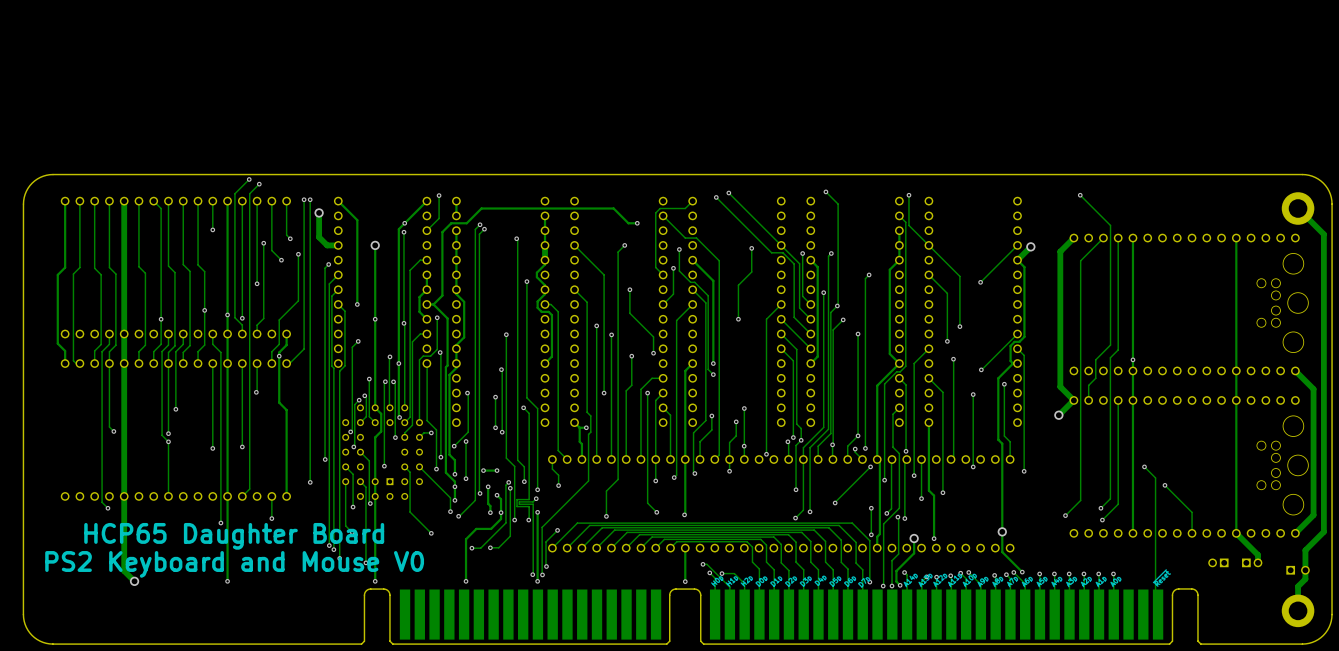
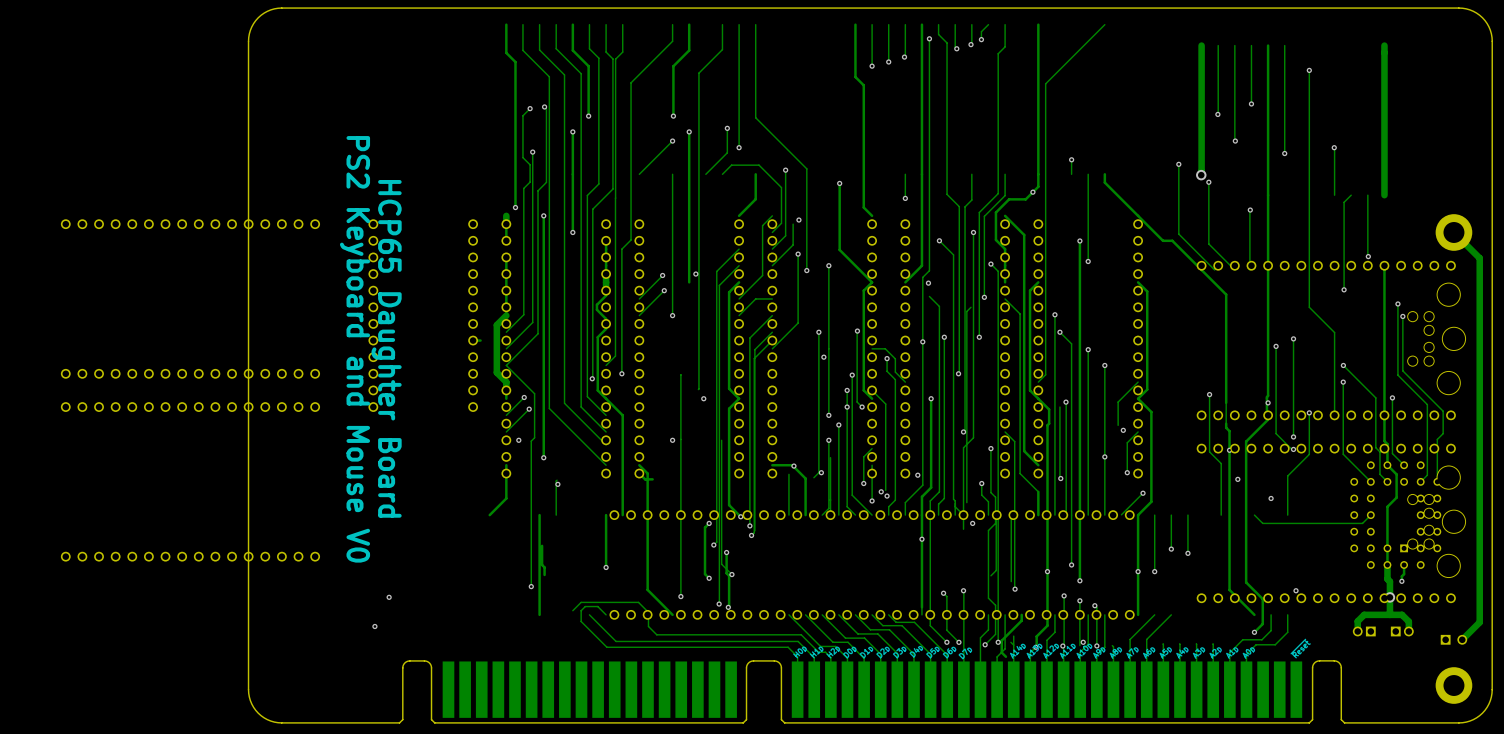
track: none -> (506, 24) (506, 52) (515, 62) (515, 207)
track: none -> (522, 24) (522, 50) (549, 76) (549, 408) (606, 465)
track: none -> (539, 24) (539, 50) (564, 74) (564, 403) (606, 444)
track: none -> (556, 24) (556, 48) (581, 73) (581, 407) (606, 431)
track: none -> (572, 24) (572, 50) (588, 66) (588, 116)
track: none -> (589, 24) (589, 48) (598, 58) (598, 184) (587, 195) (587, 396) (606, 415)
track: none -> (606, 24) (606, 52) (612, 58) (612, 189) (592, 209) (592, 378)
track: none -> (622, 24) (622, 52) (615, 59) (615, 198)
track: none -> (672, 24) (672, 41) (631, 82) (631, 240) (621, 249) (621, 373)
track: none -> (689, 24) (689, 50) (673, 66) (673, 116)
track: none -> (722, 24) (722, 49) (698, 73) (698, 389)
track: none -> (739, 24) (739, 147)
track: none -> (755, 24) (755, 117) (806, 168) (806, 270)
track: none -> (855, 24) (855, 77) (863, 85) (863, 207) (872, 215)
track: none -> (872, 24) (872, 66)
track: none -> (888, 24) (888, 62)
track: none -> (905, 24) (904, 57)
track: none -> (921, 24) (921, 265) (905, 282)
track: none -> (938, 24) (938, 34) (947, 42) (947, 194) (959, 206) (959, 373)
track: none -> (955, 24) (956, 48)
track: none -> (971, 24) (971, 44)
track: none -> (988, 24) (981, 31) (981, 39)
track: none -> (1005, 24) (1005, 46) (998, 53) (998, 193) (979, 212) (979, 337)
track: none -> (1038, 24) (1038, 186) (1025, 199) (1009, 199) (995, 212) (995, 239) (1005, 249) (1005, 257)
track: none -> (1104, 24) (1045, 83) (1045, 374) (1038, 382)
track: none -> (929, 38) (929, 270) (922, 277) (922, 485) (905, 502) (905, 515)
via: none -> (929, 38)
via: none -> (981, 39)
via: none -> (971, 44)
track: none -> (1201, 45) (1201, 175)
track: none -> (1218, 45) (1217, 114)
track: none -> (1234, 45) (1235, 141)
track: none -> (1251, 45) (1251, 103)
track: none -> (1268, 45) (1268, 265)
track: none -> (1284, 45) (1284, 153)
track: none -> (1384, 45) (1384, 195)
via: none -> (956, 48)
via: none -> (904, 57)
via: none -> (888, 62)
via: none -> (872, 66)
track: none -> (1309, 70) (1309, 307) (1334, 332) (1334, 419)
via: none -> (1309, 70)
via: none -> (1251, 103)
track: none -> (544, 106) (546, 108) (546, 182) (538, 190) (538, 333) (506, 365) (534, 393) (534, 437) (531, 441) (531, 586)
via: none -> (544, 106)
track: none -> (530, 108) (522, 115) (522, 157) (530, 164) (530, 182) (523, 188) (523, 314) (506, 332)
via: none -> (530, 108)
via: none -> (1217, 114)
via: none -> (588, 116)
via: none -> (673, 116)
track: none -> (727, 128) (727, 152) (705, 174)
via: none -> (727, 128)
track: none -> (572, 131) (572, 232)
via: none -> (572, 131)
track: none -> (689, 131) (689, 282)
via: none -> (689, 131)
track: none -> (672, 141) (639, 174)
via: none -> (672, 141)
via: none -> (1235, 141)
via: none -> (739, 147)
track: none -> (1334, 147) (1334, 195)
via: none -> (1334, 147)
track: none -> (532, 152) (532, 322) (506, 348)
via: none -> (532, 152)
via: none -> (1284, 153)
track: none -> (1071, 159) (1071, 174)
via: none -> (1071, 159)
track: none -> (1178, 164) (1178, 234) (1214, 270)
via: none -> (1178, 164)
track: none -> (785, 170) (785, 235) (772, 249)
via: none -> (785, 170)
track: none -> (722, 174) (731, 165) (759, 165) (781, 187) (781, 223) (772, 232)
track: none -> (755, 174) (755, 199) (739, 215)
track: none -> (905, 174) (905, 198)
track: none -> (971, 174) (971, 200) (965, 206) (963, 431)
track: none -> (1005, 174) (1005, 195) (984, 216) (984, 297)
track: none -> (1088, 174) (1088, 261)
via: none -> (1201, 175)
track: none -> (1208, 182) (1208, 244) (1234, 270)
via: none -> (1208, 182)
track: none -> (839, 183) (839, 249) (872, 282) (863, 290) (863, 390) (872, 398)
via: none -> (839, 183)
via: none -> (1032, 192)
track: none -> (1351, 195) (1344, 202) (1344, 289)
track: none -> (1367, 195) (1368, 256)
track: none -> (615, 198) (615, 356) (606, 365)
via: none -> (905, 198)
track: (249, 179) (234, 193) (234, 317) (242, 325) (242, 334) -> none
via: (249, 179) -> none
track: (259, 184) (249, 193) (249, 489) (242, 496) -> none
via: (259, 184) -> none
via: none -> (515, 207)
track: none -> (1250, 210) (1249, 270)
via: none -> (1250, 210)
track: (825, 191) (838, 204) (838, 305) (830, 312) (830, 433) (818, 446) (818, 459) -> none
via: (825, 191) -> none
track: none -> (506, 215) (506, 224)
track: none -> (543, 215) (543, 457)
via: none -> (543, 215)
track: none -> (772, 215) (762, 225) (762, 275) (739, 298)
track: (728, 193) (799, 263) (799, 308) (810, 319) -> none
via: (728, 193) -> none
track: none -> (1005, 215) (1024, 234) (1024, 451) (1038, 465)
track: (439, 195) (439, 218) (426, 230) -> none
via: (439, 195) -> none
track: (908, 195) (908, 225) (959, 276) (959, 326) -> none
via: (908, 195) -> none
track: (1080, 195) (1110, 225) (1110, 345) (1095, 359) -> (1104, 174) (1104, 182) (1163, 240) (1172, 240) (1226, 294) (1226, 402)
via: (1080, 195) -> none
track: (716, 197) (771, 252) (782, 252) (794, 264) (794, 317) (810, 334) -> none
track: (304, 199) (304, 349) (289, 363) -> none
via: (304, 199) -> none
track: (310, 199) (310, 482) -> none
via: (310, 199) -> none
track: (65, 201) (65, 267) (57, 274) (57, 343) (65, 350) (65, 363) -> none
track: (79, 201) (79, 267) (73, 274) (73, 360) (76, 363) -> none
track: (94, 201) (94, 268) (101, 274) (101, 344) (94, 350) (94, 363) -> none
track: (109, 201) (109, 267) (115, 274) (115, 345) (109, 351) (109, 427) (113, 431) -> none
track: (124, 201) (124, 571) (134, 581) -> none
track: (138, 201) (138, 266) (145, 273) (145, 345) (138, 351) (138, 363) -> none
track: (153, 201) (161, 208) (161, 344) (153, 351) (153, 363) -> none
track: (168, 201) (168, 266) (174, 272) (174, 346) (168, 352) (168, 433) -> none
track: (183, 201) (183, 264) (190, 271) (190, 345) (183, 352) (183, 363) -> none
track: (198, 201) (198, 264) (204, 271) (204, 345) (198, 351) (198, 363) -> none
track: (212, 201) (212, 229) -> none
track: (227, 201) (227, 581) -> none
track: (242, 201) (242, 318) -> none
track: (257, 201) (257, 283) -> none
track: (271, 201) (271, 250) (281, 260) -> none
track: (286, 201) (286, 235) (290, 238) -> none
track: (338, 201) (357, 220) (357, 304) -> none
track: (426, 201) (398, 229) (399, 417) -> none
track: (692, 201) (685, 208) (660, 208) (655, 212) (655, 267) (663, 274) -> none
track: none -> (793, 224) (793, 244) (772, 265)
via: none -> (572, 232)
track: none -> (973, 232) (973, 437) (963, 447) (963, 529)
via: none -> (973, 232)
track: (319, 212) (319, 237) (327, 245) (338, 245) -> none
via: (319, 212) -> none
track: (663, 215) (685, 238) (696, 238) (719, 260) (719, 455) (714, 459) -> none
track: none -> (939, 240) (953, 254) (953, 499) (955, 515)
via: none -> (939, 240)
track: (899, 215) (905, 222) (905, 366) (884, 384) (884, 447) -> (981, 483) (981, 495) (988, 501)
track: none -> (1079, 240) (1079, 580)
via: none -> (1079, 240)
via: (404, 223) -> none
track: (637, 223) (628, 223) (613, 208) (481, 208) (466, 223) (451, 223) (442, 232) (442, 295) (433, 304) (447, 318) (445, 472) (454, 481) (454, 486) -> none
via: (637, 223) -> none
track: none -> (739, 249) (716, 271) (716, 542) (713, 545)
track: (480, 224) (475, 229) (475, 500) (458, 516) -> none
via: (480, 224) -> none
track: none -> (798, 254) (798, 323) (772, 348)
via: none -> (798, 254)
via: (212, 229) -> none
track: (484, 229) (479, 234) (480, 493) -> none
via: (484, 229) -> none
via: none -> (1368, 256)
track: (1320, 231) (1323, 234) (1323, 531) (1305, 550) (1305, 579) (1298, 586) (1298, 610) -> (1479, 258) (1479, 622) (1462, 639)
track: (403, 232) (404, 407) -> none
via: (404, 232) -> none
via: none -> (1088, 261)
track: none -> (990, 264) (998, 271) (998, 642)
via: none -> (990, 264)
via: (290, 238) -> none
track: (516, 238) (517, 460) (524, 466) (524, 481) -> none
via: (516, 238) -> none
track: none -> (739, 265) (719, 285) (719, 604)
track: none -> (828, 265) (828, 415)
track: (1073, 238) (1060, 251) (1060, 386) (1073, 400) -> none
track: (1103, 238) (1080, 260) (1080, 500) (1065, 515) -> none
track: (1118, 238) (1118, 349) (1110, 357) (1110, 498) (1100, 508) -> none
via: none -> (806, 270)
track: (263, 243) (263, 318) (257, 325) (257, 334) -> none
via: (263, 243) -> none
track: (375, 245) (375, 407) (381, 413) (381, 431) (375, 437) (375, 581) -> none
via: (375, 245) -> none
track: (574, 245) (604, 274) -> (672, 174) (672, 307)
track: (624, 245) (618, 252) (618, 479) (606, 491) (606, 516) -> none
track: (1017, 245) (980, 282) -> none
track: none -> (662, 275) (639, 298)
via: none -> (662, 275)
track: (1030, 246) (1017, 260) (1024, 267) (1024, 336) (1010, 345) (1010, 361) (1013, 363) -> none
via: (1030, 246) -> none
track: (751, 248) (751, 272) (738, 285) (738, 319) -> none
via position: (751, 248) -> (828, 265)
track: (679, 249) (679, 271) (708, 295) (708, 369) (713, 374) -> none
via: (679, 249) -> none
track: none -> (739, 282) (729, 292) (729, 388) (739, 398) (729, 408) (729, 505) (740, 516)
track: (899, 252) (899, 260) (889, 269) (889, 353) (899, 363) (877, 385) (877, 459) -> none
track: none -> (1038, 282) (1030, 290) (1030, 390) (1049, 409) (1049, 423) (1047, 425) (1047, 625) (1036, 636) (1036, 643)
track: none -> (1138, 282) (1147, 291) (1147, 389) (1138, 398) (1151, 412) (1151, 501) (1138, 515) (1138, 614)
track: (802, 253) (802, 296) (810, 304) -> none
via: (802, 253) -> none
track: (831, 253) (828, 256) (828, 429) (810, 447) (810, 511) -> none
track: (298, 254) (298, 300) (279, 319) (279, 344) (271, 351) (271, 363) -> none
via: (298, 254) -> none
via: none -> (1344, 289)
via: (281, 260) -> none
track: (426, 260) (420, 260) (410, 270) (410, 417) (404, 422) -> none
track: none -> (664, 290) (639, 315)
via: none -> (664, 290)
track: (692, 260) (713, 280) (713, 363) -> none
track: (810, 260) (817, 267) (817, 356) (810, 363) -> none
track: (328, 264) (325, 268) (325, 459) -> none
via: (328, 264) -> none
track: none -> (929, 296) (939, 306) (939, 491) (930, 500) (930, 625) (946, 642)
via: none -> (984, 297)
track: none -> (772, 298) (755, 298) (739, 315)
track: (673, 268) (673, 294) (663, 304) -> none
via: (673, 268) -> none
track: none -> (1397, 303) (1397, 375) (1427, 404) (1427, 475) (1420, 481)
via: none -> (1397, 303)
track: (338, 274) (329, 283) (329, 545) -> none
track: (426, 274) (426, 289) (419, 297) (419, 311) (426, 319) -> none
via: (869, 274) -> none
track: (928, 274) (947, 293) (947, 341) -> none
track: (526, 281) (526, 397) (537, 408) (537, 489) -> none
via: (526, 281) -> none
track: none -> (1054, 314) (1054, 515)
via: none -> (1054, 314)
track: (456, 282) (456, 294) (464, 301) (464, 337) (456, 345) -> (506, 315) (496, 325) (496, 372) (506, 382) (506, 386)
track: (604, 282) (604, 393) -> none
via: none -> (672, 315)
track: none -> (772, 315) (749, 338) (749, 525)
via: (980, 282) -> none
via: (257, 283) -> none
track: none -> (1402, 316) (1402, 370) (1443, 411) (1443, 433) (1437, 439) (1437, 481)
via: none -> (1402, 316)
track: (338, 289) (331, 296) (333, 549) -> none
track: (574, 289) (587, 302) (587, 412) (590, 415) (590, 432) (588, 434) (588, 480) (542, 527) (542, 574) -> none
track: (629, 289) (629, 313) (653, 336) (653, 353) -> none
via: (629, 289) -> none
track: (692, 289) (705, 302) (705, 420) (693, 432) (694, 473) -> none
track: (823, 292) (823, 427) (803, 447) (803, 510) (795, 518) -> none
via: (823, 292) -> none
track: none -> (857, 331) (857, 402) (862, 407)
via: none -> (857, 331)
track: none -> (772, 332) (754, 349) (754, 530)
track: none -> (818, 332) (818, 472) (813, 477)
via: none -> (818, 332)
track: none -> (1059, 332) (1071, 343) (1071, 564)
via: none -> (1059, 332)
track: none -> (944, 337) (944, 498) (938, 504) (938, 515)
via: none -> (944, 337)
via: none -> (979, 337)
track: none -> (1293, 338) (1293, 436)
via: none -> (1293, 338)
track: (338, 304) (344, 311) (344, 365) (339, 371) (339, 558) -> none
via: (357, 304) -> none
track: (545, 304) (550, 304) (558, 311) (558, 450) (567, 459) -> none
track: (781, 304) (766, 319) (766, 454) -> none
via: none -> (922, 341)
via: (837, 305) -> none
track: (537, 307) (541, 311) (548, 311) (551, 315) (551, 356) (545, 363) -> (597, 344) (597, 390) (622, 415) (622, 515)
track: none -> (1276, 346) (1276, 433) (1293, 449)
via: none -> (1276, 346)
via: (204, 310) -> none
text: none -> HCP65 Daughter Board (386, 348)
track: none -> (872, 348) (885, 348) (895, 358) (895, 372) (905, 382)
text: none -> PS2 Keyboard and Mouse V0 (355, 349)
track: none -> (1088, 349) (1088, 441)
via: none -> (1088, 349)
via: (227, 314) -> none
track: (437, 317) (437, 349) (430, 356) (423, 356) (419, 359) (419, 422) -> none
via: (437, 317) -> none
via: (242, 318) -> none
via: (161, 319) -> none
via: (375, 319) -> none
track: (781, 319) (810, 348) -> none
track: (843, 319) (833, 329) (832, 459) -> none
via: (843, 319) -> none
via: none -> (887, 358)
via: (403, 323) -> none
track: (596, 325) (596, 459) -> none
via: (596, 325) -> none
via: (959, 326) -> none
track: none -> (1104, 365) (1104, 515)
via: none -> (1104, 365)
track: none -> (1343, 365) (1375, 397) (1375, 447) (1379, 451) (1379, 474) (1387, 481)
via: none -> (1343, 365)
track: (109, 334) (109, 344) (102, 351) (102, 502) (107, 508) -> none
track: (168, 334) (168, 345) (162, 351) (162, 435) (168, 441) (168, 496) -> none
track: (183, 334) (183, 344) (175, 351) (175, 409) -> none
track: (212, 334) (212, 344) (220, 352) (220, 523) -> none
track: (286, 334) (286, 345) (279, 352) (279, 402) (286, 410) (286, 496) -> none
track: (426, 334) (420, 334) (412, 341) (412, 425) (404, 432) (404, 437) -> none
track: (506, 334) (506, 458) (514, 466) (514, 520) -> none
via: (506, 334) -> none
via: none -> (621, 373)
via: (611, 334) -> none
track: (781, 334) (796, 349) (796, 424) (801, 428) (801, 440) (796, 445) (796, 452) -> (887, 358) (887, 371) (895, 379) (895, 500) (888, 506)
track: (858, 334) (858, 435) (847, 446) (847, 459) -> none
track: (1017, 334) (981, 369) -> none
track: none -> (852, 375) (852, 495) (872, 515)
via: none -> (852, 375)
via: none -> (592, 378)
track: (358, 341) (352, 347) (352, 430) (350, 431) -> none
via: (358, 341) -> none
via: (947, 341) -> none
track: none -> (1138, 382) (1118, 402) (1118, 425)
track: none -> (1343, 382) (1343, 454) (1370, 481)
via: none -> (1343, 382)
track: none -> (847, 390) (847, 506) (855, 515)
via: none -> (847, 390)
track: (928, 348) (914, 363) (914, 475) -> none
track: (1017, 348) (1024, 355) (1024, 471) -> none
track: (440, 352) (440, 457) -> none
via: (440, 352) -> none
track: none -> (1209, 394) (1209, 451) (1221, 463) (1221, 515)
via: none -> (1209, 394)
via: (653, 353) -> none
track: (1132, 353) (1132, 533) -> (1268, 395) (1266, 418)
track: none -> (524, 397) (506, 415)
via: none -> (524, 397)
track: none -> (1392, 397) (1392, 453) (1404, 465)
via: none -> (1392, 397)
via: (279, 356) -> none
track: (389, 356) (389, 407) -> none
via: (389, 356) -> none
track: (456, 356) (456, 367) (449, 374) (449, 454) (454, 460) (454, 474) -> none
track: (631, 356) (631, 385) (626, 390) (626, 459) -> none
via: none -> (931, 398)
track: (212, 363) (212, 448) -> none
track: (242, 363) (242, 446) -> none
track: (257, 363) (256, 392) -> none
via: (398, 363) -> none
track: (427, 363) (427, 420) (436, 429) (436, 469) -> none
track: (692, 363) (685, 370) (684, 514) -> none
via: (713, 363) -> none
via: none -> (847, 407)
via: none -> (862, 407)
track: none -> (1059, 407) (1060, 478)
track: (1013, 363) (998, 378) (998, 439) (1002, 443) (1002, 552) (1022, 572) -> none
track: none -> (529, 409) (506, 431)
via: none -> (529, 409)
track: none -> (1309, 412) (1309, 454) (1287, 476) (1287, 515)
via: none -> (1309, 412)
track: (501, 369) (502, 432) -> none
via: (501, 369) -> none
via: (981, 369) -> none
via: none -> (828, 415)
track: (1295, 370) (1313, 389) (1313, 515) (1295, 533) -> none
via: (713, 374) -> none
track: none -> (1268, 419) (1246, 441) (1246, 582) (1262, 599) (1262, 624) (1254, 632)
track: (663, 378) (652, 378) (640, 389) (640, 459) -> none
track: (899, 378) (906, 384) (906, 451) -> none
track: (928, 378) (942, 392) (942, 492) -> none
track: (1095, 378) (1088, 385) (1088, 400) -> (1226, 423) (1226, 427) (1229, 431) (1229, 589) (1254, 614)
track: (369, 379) (369, 416) (375, 422) -> none
via: (369, 379) -> none
track: none -> (838, 424) (838, 515)
via: none -> (838, 424)
track: (385, 381) (384, 466) -> none
via: (385, 381) -> none
track: (393, 381) (395, 383) (395, 437) -> none
via: (393, 381) -> none
track: (1004, 384) (1004, 436) (1010, 441) (1010, 459) -> none
via: none -> (963, 431)
track: none -> (1005, 431) (1014, 441) (1015, 589)
track: none -> (1138, 431) (1127, 442) (1127, 472)
via: none -> (1293, 436)
via: (256, 392) -> none
track: (467, 393) (468, 432) (454, 446) -> none
via: (647, 393) -> none
track: (663, 393) (655, 400) (655, 480) -> none
track: none -> (828, 440) (828, 508) (822, 515)
via: none -> (828, 440)
track: (1236, 393) (1236, 533) (1258, 555) -> (1384, 441) (1387, 444) (1387, 465) (1396, 474) (1396, 497) (1387, 506) (1387, 579) (1389, 581) (1389, 614)
via: (973, 394) -> none
track: (364, 395) (366, 416) (360, 422) -> none
via: (364, 395) -> none
track: (495, 397) (495, 427) -> none
via: (495, 397) -> none
track: (359, 400) (354, 404) (353, 446) -> none
via: (359, 400) -> none
track: none -> (872, 448) (863, 456) (863, 483)
via: none -> (990, 448)
track: (1073, 400) (1058, 415) -> none
track: (1118, 400) (1118, 504) (1102, 520) -> none
via: none -> (1229, 450)
via: none -> (1293, 449)
track: (523, 407) (529, 413) (529, 499) (517, 499) (517, 506) (529, 506) (528, 520) -> none
via: (523, 407) -> none
track: (663, 407) (670, 415) (670, 459) -> none
track: (899, 407) (892, 414) (892, 447) (899, 453) (899, 508) (883, 524) (883, 586) -> none
via: none -> (1104, 456)
via: none -> (543, 457)
via: (744, 408) -> none
via: (175, 409) -> none
track: none -> (506, 465) (506, 498) (489, 515)
track: none -> (772, 465) (792, 465) (805, 478) (805, 515)
track: (711, 415) (711, 429) (700, 441) (700, 459) -> none
track: none -> (872, 465) (872, 500)
via: (1058, 415) -> none
via: (399, 417) -> none
track: (736, 421) (736, 435) (729, 442) (729, 471) -> none
via: none -> (1127, 472)
track: (928, 422) (928, 438) -> (1005, 298) (1020, 313) (1020, 473) (1038, 491)
track: none -> (788, 474) (788, 515)
via: none -> (917, 475)
via: (495, 427) -> none
track: (579, 427) (579, 441) (581, 444) -> (639, 465) (647, 473) (647, 497)
via: (586, 427) -> none
via: none -> (1060, 478)
via: none -> (1237, 479)
track: none -> (557, 480) (556, 515)
via: (113, 431) -> none
via: (350, 431) -> none
via: none -> (863, 483)
via: none -> (981, 483)
track: (431, 432) (423, 432) (419, 437) -> none
via: (431, 432) -> none
via: (168, 433) -> none
via: (858, 435) -> none
via: (395, 437) -> none
via: (793, 437) -> none
via: none -> (881, 491)
via: (801, 440) -> none
track: none -> (1143, 493) (1121, 514)
via: none -> (1143, 493)
via: (168, 441) -> none
track: (466, 441) (466, 478) -> none
via: (466, 441) -> none
track: (787, 441) (788, 459) -> none
via: (787, 441) -> none
via: none -> (887, 496)
via: (832, 444) -> none
via: (242, 446) -> none
via: (353, 446) -> none
via: (454, 446) -> none
via: (744, 446) -> none
via: none -> (872, 500)
via: (212, 448) -> none
via: (865, 448) -> none
via: (855, 449) -> none
via: (906, 451) -> none
track: (360, 452) (369, 461) (370, 503) -> none
part: (382, 452) -> none
via: (766, 454) -> none
via: (440, 457) -> none
via: (325, 459) -> none
track: none -> (539, 515) (539, 614)
track: none -> (606, 515) (606, 567)
track: (552, 459) (552, 469) (558, 475) (558, 485) -> none
track: none -> (647, 515) (647, 589) (672, 614)
track: none -> (680, 515) (680, 596)
track: (796, 459) (796, 489) -> none
track: (884, 459) (884, 473) -> (990, 448) (990, 492) (995, 497) (995, 523) (988, 530)
track: (921, 459) (921, 498) -> none
track: (928, 459) (928, 490) (934, 495) (934, 538) -> none
track: (973, 459) (973, 466) -> none
track: none -> (1154, 515) (1154, 571)
track: none -> (1171, 515) (1171, 549)
track: none -> (1187, 515) (1187, 553)
track: none -> (1370, 515) (1362, 523) (1262, 523) (1254, 515)
part: none -> (1395, 515)
via: none -> (740, 516)
track: (879, 461) (879, 534) (877, 536) (877, 548) -> none
track: (345, 466) (353, 474) (353, 507) -> none
via: (384, 466) -> none
track: (404, 466) (410, 472) (410, 512) (431, 533) -> none
track: (419, 466) (450, 497) (450, 511) -> none
track: none -> (709, 523) (705, 527) (705, 574) (709, 578)
via: none -> (709, 523)
track: (870, 466) (835, 503) -> none
via: (973, 466) -> none
track: (1144, 466) (1155, 477) (1155, 612) -> none
via position: (1144, 466) -> (1271, 498)
via: (436, 469) -> none
via: none -> (749, 525)
via: (483, 470) -> none
track: (497, 470) (483, 470) -> none
via: (497, 470) -> none
via: (729, 471) -> none
via: (1024, 471) -> none
via: (694, 473) -> none
via: (454, 474) -> none
via: (914, 475) -> none
via: (466, 478) -> none
via: (655, 480) -> none
via: none -> (921, 539)
track: none -> (988, 538) (988, 598) (995, 605) (995, 634) (985, 644)
via: (884, 480) -> none
track: (345, 481) (345, 525) (352, 532) -> none
track: (360, 481) (365, 487) (365, 562) -> none
via: (524, 481) -> none
via: (310, 482) -> none
track: (508, 482) (505, 485) (505, 522) (480, 548) (471, 548) -> none
via: (508, 482) -> none
via: (558, 485) -> none
track: (1164, 485) (1192, 512) (1192, 533) -> none
via: (1164, 485) -> none
track: (454, 486) (454, 500) -> none
via: (454, 486) -> none
via: (488, 486) -> none
via: none -> (713, 545)
track: (510, 488) (510, 536) (498, 547) (490, 547) -> none
via: (510, 488) -> none
via: (537, 489) -> none
via: (796, 489) -> none
via: none -> (1171, 549)
track: none -> (726, 552) (726, 573) (729, 575) (728, 607)
via: none -> (726, 552)
via: (942, 492) -> none
via: (480, 493) -> none
via: none -> (1187, 553)
track: (497, 495) (501, 499) (501, 518) (491, 528) (476, 528) (466, 539) (466, 581) -> none
via: (497, 495) -> none
track: (271, 496) (271, 518) -> none
track: (536, 498) (533, 501) (519, 501) (519, 504) (533, 504) (532, 574) -> none
via: (536, 498) -> none
via: (921, 498) -> none
via: (454, 500) -> none
via: (370, 503) -> none
via: (835, 503) -> none
via: none -> (1071, 564)
track: none -> (1404, 564) (1401, 581)
via: none -> (606, 567)
via: (353, 507) -> none
via: (107, 508) -> none
track: (871, 508) (871, 534) -> none
via: (871, 508) -> none
via: (1100, 508) -> none
via: none -> (1047, 571)
via: none -> (1138, 571)
via: none -> (1154, 571)
via: (450, 511) -> none
via: (810, 511) -> none
via: (490, 512) -> none
via: (501, 512) -> none
track: (537, 512) (537, 581) -> none
via: (537, 512) -> none
via: (886, 513) -> none
via: (684, 514) -> none
via: none -> (709, 578)
via: (1065, 515) -> none
via: (458, 516) -> none
via: (606, 516) -> none
track: (897, 517) (898, 554) (892, 560) (892, 586) -> none
via: (897, 517) -> none
via: none -> (1079, 580)
via: (271, 518) -> none
via: (795, 518) -> none
via: (904, 518) -> none
via: none -> (1401, 581)
via: (514, 520) -> none
via: (528, 520) -> none
via: (1102, 520) -> none
via: (220, 523) -> none
via: none -> (531, 586)
via: none -> (1015, 589)
via: none -> (963, 590)
via: none -> (1296, 590)
track: none -> (943, 593) (946, 596) (946, 630) (958, 642)
via: none -> (943, 593)
track: (557, 530) (546, 541) (546, 566) -> none
via: (557, 530) -> none
via: none -> (680, 596)
track: none -> (1064, 595) (1064, 646)
via: none -> (1064, 595)
via: (1002, 531) -> none
via: none -> (1389, 597)
via: (431, 533) -> none
via: (871, 534) -> none
track: none -> (1079, 600) (1079, 645)
via: none -> (1079, 600)
text: HCP65 Daughter Board (234, 536) -> none
via: none -> (719, 604)
track: (914, 538) (914, 548) -> none
via: (914, 538) -> none
via: (934, 538) -> none
track: none -> (1094, 605) (1096, 607) (1096, 645)
via: none -> (1094, 605)
via: none -> (728, 607)
track: (825, 541) (814, 530) (614, 530) (596, 548) -> (921, 607) (921, 496) (931, 487) (931, 398)
via: (329, 545) -> none
via: (490, 547) -> none
via: (471, 548) -> none
track: (552, 548) (577, 523) (852, 523) (869, 540) (869, 582) -> none
track: (567, 548) (589, 525) (839, 525) (856, 542) (856, 563) (862, 569) -> (963, 590) (963, 639)
track: (581, 548) (602, 527) (828, 527) (841, 540) (841, 562) (848, 569) (848, 583) -> (888, 614) (896, 622) (914, 622) (947, 655)
track: (611, 548) (627, 532) (801, 532) (810, 541) (810, 562) (818, 569) (818, 583) -> (855, 614) (870, 629) (889, 629) (913, 654)
track: (626, 548) (639, 534) (788, 534) (796, 542) (796, 562) (803, 569) (803, 582) -> (838, 614) (857, 633) (877, 633) (897, 653)
track: (640, 548) (652, 537) (773, 537) (781, 544) (781, 562) (788, 570) (788, 583) -> (822, 614) (845, 638) (864, 638) (880, 654)
track: (655, 548) (664, 539) (760, 539) (766, 545) (766, 562) (774, 569) (774, 586) -> (805, 614) (833, 642) (847, 642) (864, 658)
track: (670, 548) (676, 541) (747, 541) (752, 547) (752, 562) (759, 569) (759, 586) -> (788, 614) (820, 646) (835, 646) (847, 658)
track: (685, 548) (685, 581) -> none
track: (825, 548) (825, 562) (833, 569) (833, 583) -> (872, 614) (882, 625) (902, 625) (930, 654)
track: none -> (988, 614) (988, 629) (980, 637) (980, 689)
track: none -> (1005, 614) (1005, 648) (997, 656) (997, 689)
track: none -> (1054, 614) (1054, 632) (1046, 640) (1046, 647)
via: (333, 549) -> none
track: none -> (1408, 622) (1402, 614) (1364, 614) (1357, 621) (1357, 631)
via: (365, 562) -> none
via: none -> (1254, 632)
text: PS2 Keyboard and Mouse V0 (234, 564) -> none
track: (703, 564) (706, 564) (729, 587) -> (589, 614) (616, 641) (798, 641) (814, 658)
via: (703, 564) -> none
via: (546, 566) -> none
track: (709, 572) (715, 578) (715, 585) -> (606, 614) (597, 606) (585, 606) (581, 610) (581, 621) (606, 647) (788, 647) (797, 656)
via: (709, 572) -> none
via: none -> (946, 642)
via: none -> (958, 642)
via: none -> (998, 642)
via: (904, 572) -> none
track: (968, 572) (980, 584) -> (1104, 614) (1104, 647) (1096, 655)
track: (1013, 572) (1025, 583) -> (1171, 614) (1146, 639) (1146, 655)
via: (1013, 572) -> none
via: (1022, 572) -> none
track: (721, 573) (734, 573) (744, 586) -> (572, 610) (581, 602) (638, 602) (648, 612) (648, 626) (656, 634) (801, 634) (818, 652) (825, 652) (830, 657)
via: (721, 573) -> none
track: (960, 573) (966, 581) -> (1088, 614) (1088, 644) (1080, 652)
via: (960, 573) -> none
via: (1039, 573) -> none
via: (1054, 573) -> none
via: (1069, 573) -> none
via: (1083, 573) -> none
track: (1098, 573) (1099, 581) -> (1271, 614) (1271, 630) (1261, 639) (1242, 639) (1229, 652)
via: (1098, 573) -> none
track: (1113, 573) (1113, 583) -> (1287, 614) (1287, 632) (1275, 644) (1256, 644) (1246, 654)
via: (1113, 573) -> none
via: (532, 574) -> none
via: (542, 574) -> none
via: none -> (985, 644)
track: (1006, 574) (1010, 578) -> (1154, 614) (1130, 639) (1130, 649)
via: (1006, 574) -> none
via: none -> (1096, 645)
via: (994, 575) -> none
via: (936, 577) -> none
via: (134, 581) -> none
via: (227, 581) -> none
via: (375, 581) -> none
via: (466, 581) -> none
via: (537, 581) -> none
via: (685, 581) -> none
via: (869, 582) -> none
via: (900, 585) -> none
via: (883, 586) -> none
via: (892, 586) -> none
board edge: (1332, 614) (1332, 204) (1327, 188) (1320, 180) (1312, 176) (1302, 174) (53, 174) (40, 177) (28, 188) (23, 204) (23, 614) (26, 627) (34, 637) (49, 643) (256, 644) -> (1492, 689) (1492, 41) (1488, 26) (1476, 13) (1458, 8) (281, 8) (270, 9) (258, 17) (250, 30) (248, 41) (248, 689) (250, 700) (258, 713) (267, 719) (281, 722)

